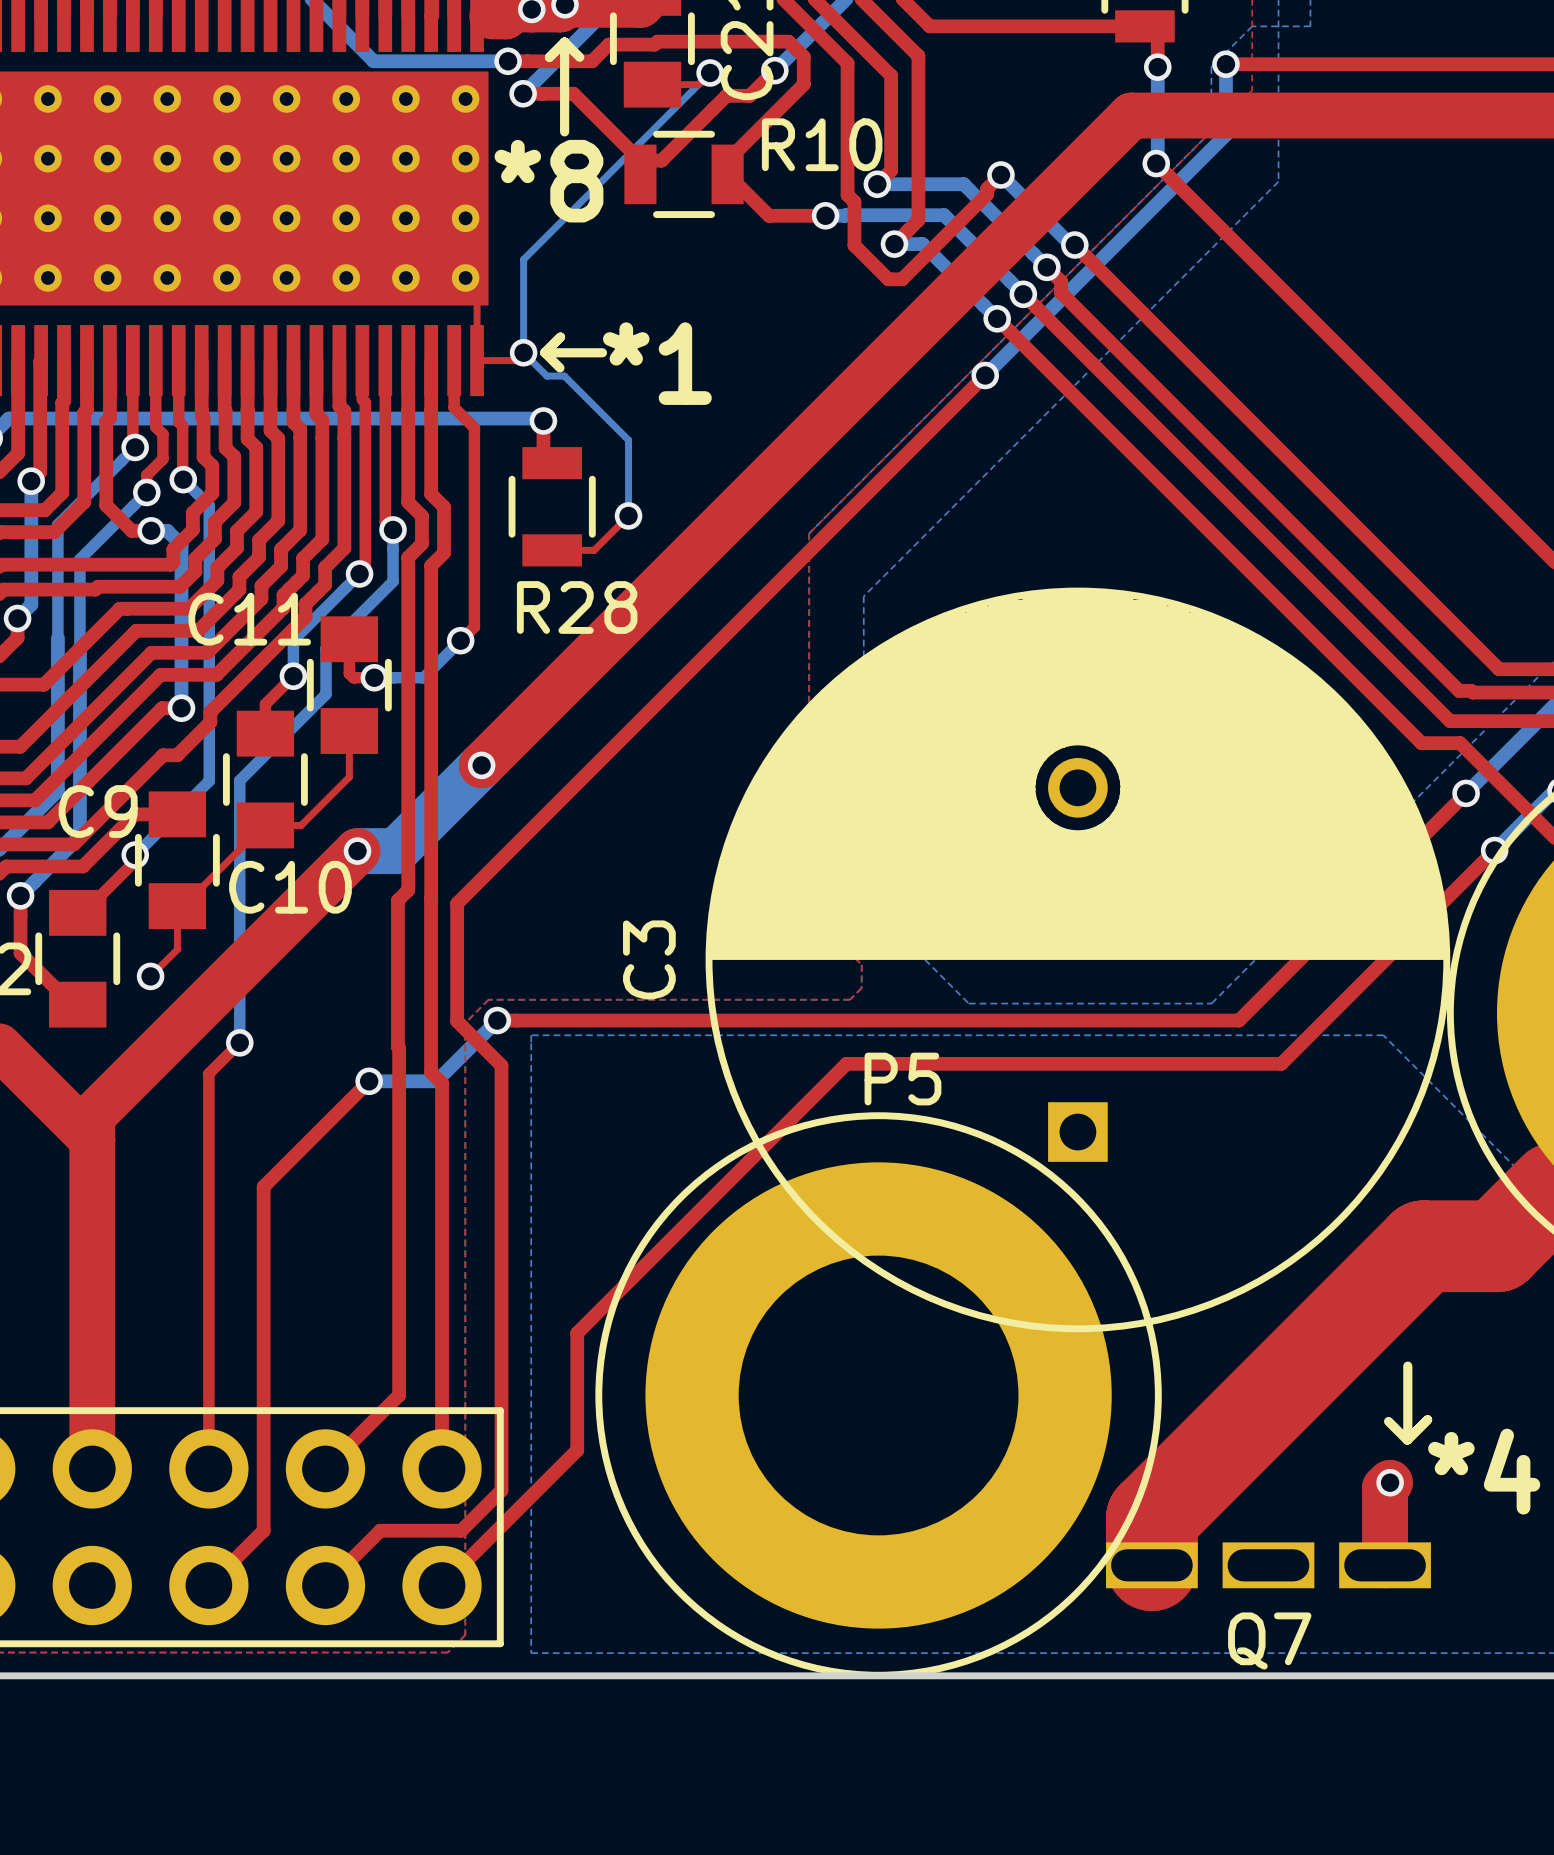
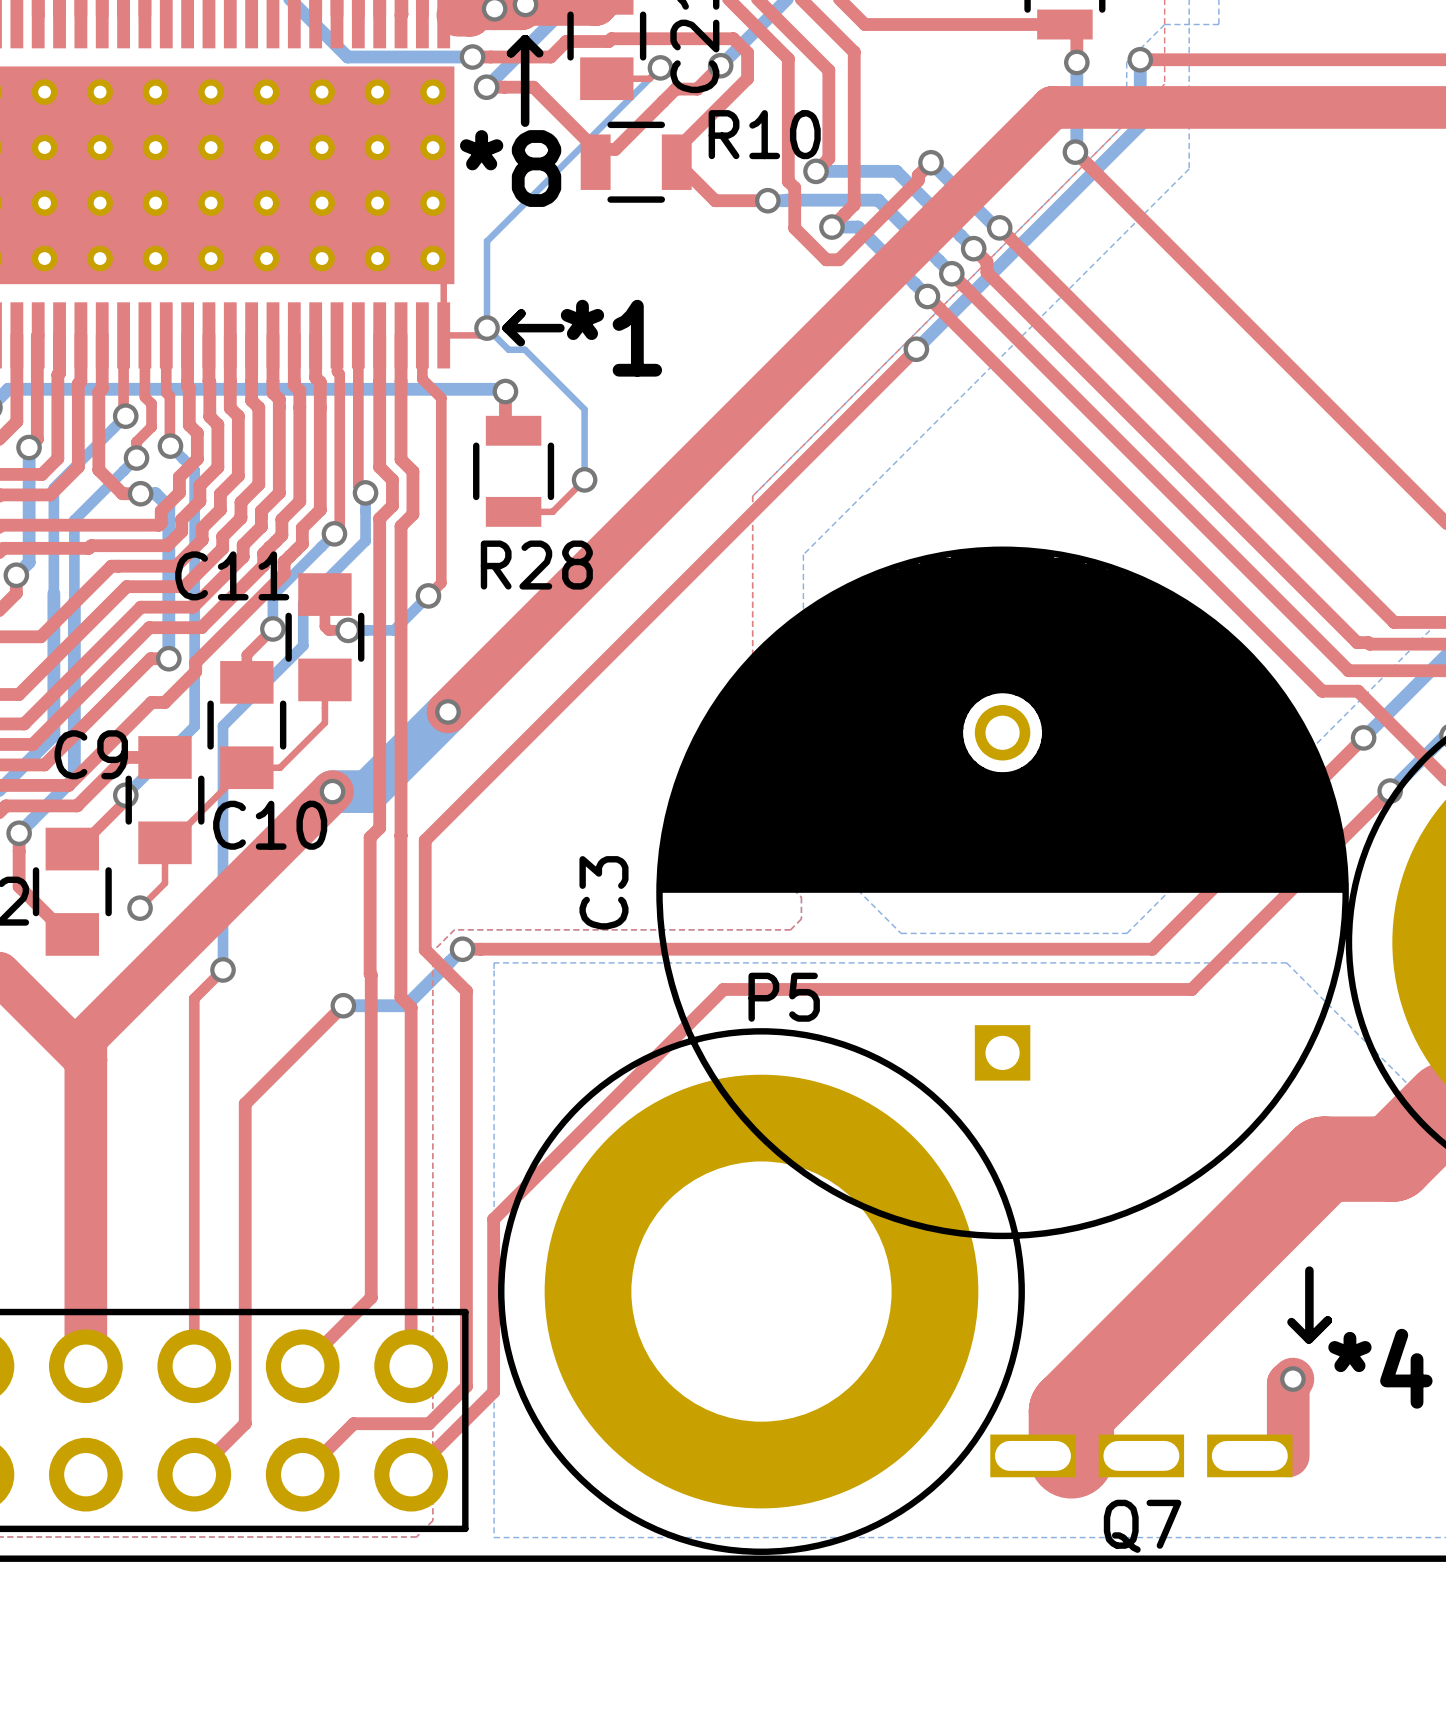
top track: (846, 1063) (577, 1333) (577, 1450) (530, 1496) -> (787, 989) (723, 989) (493, 1219) (493, 1392)
P5 position: (878, 1395) -> (761, 1291)
Q7 position: (1268, 1565) -> (1141, 1455)

